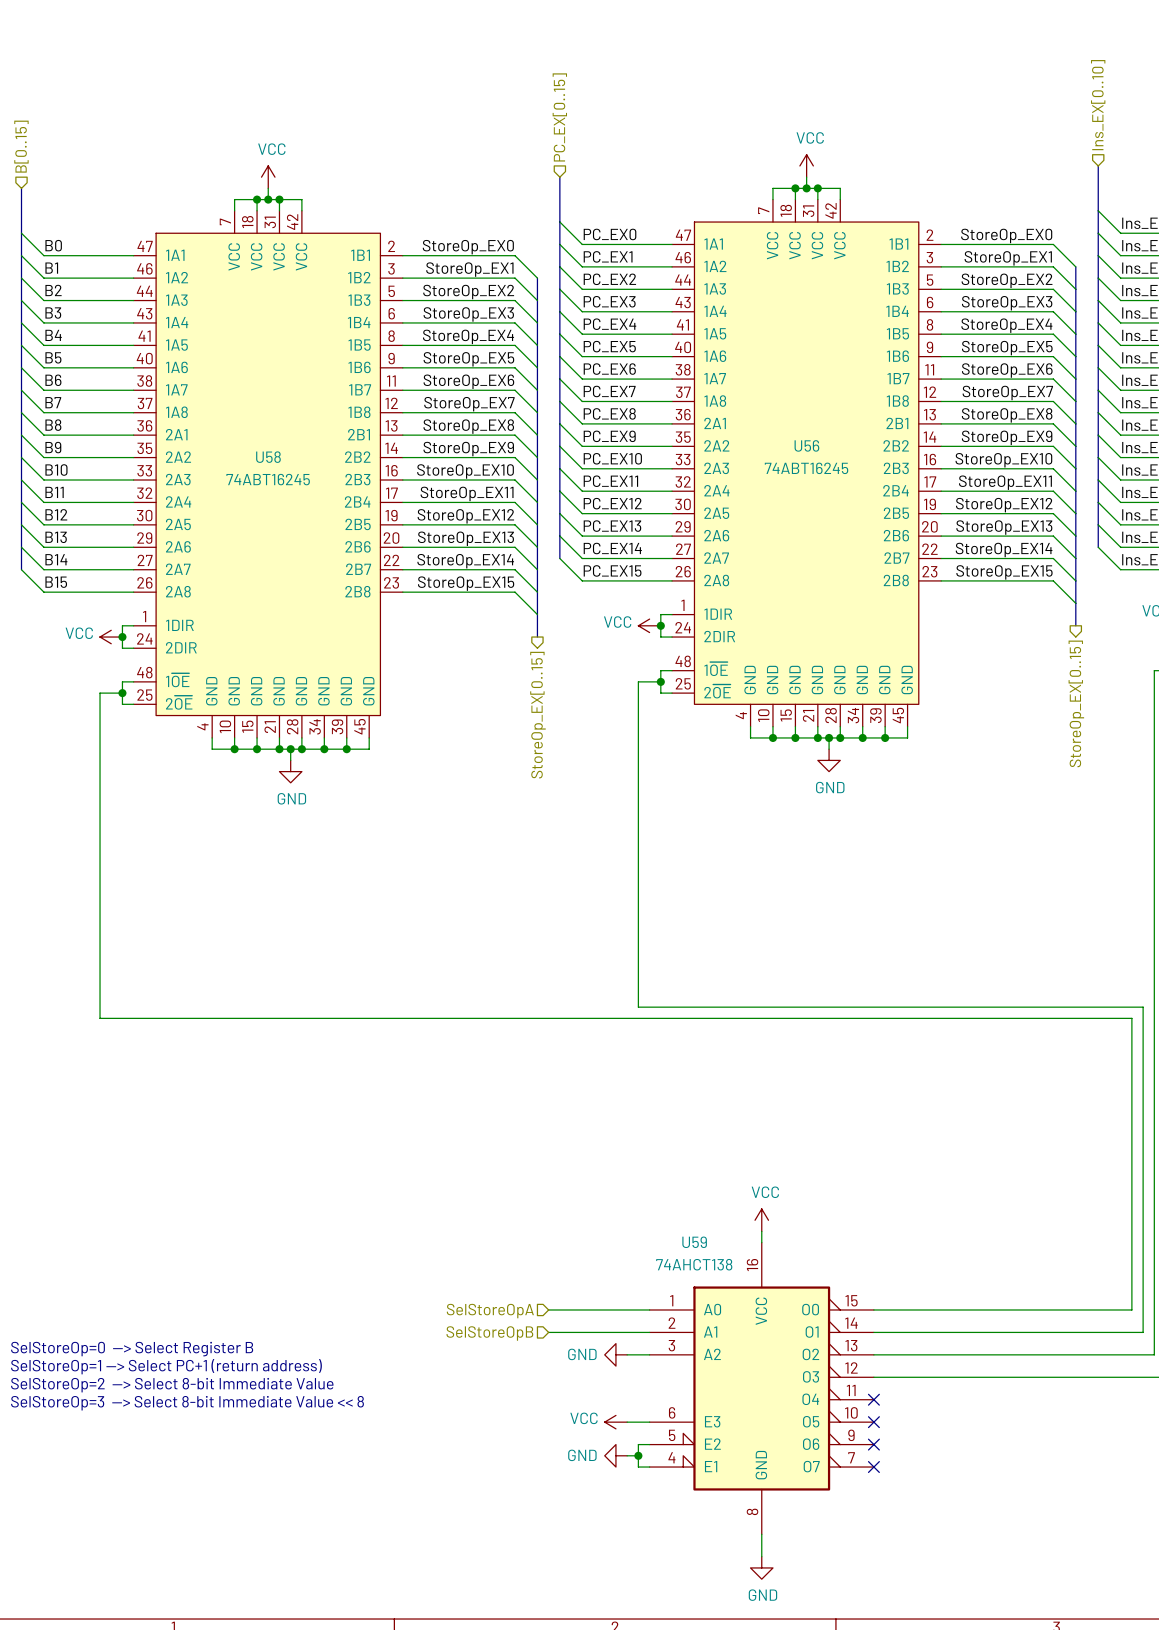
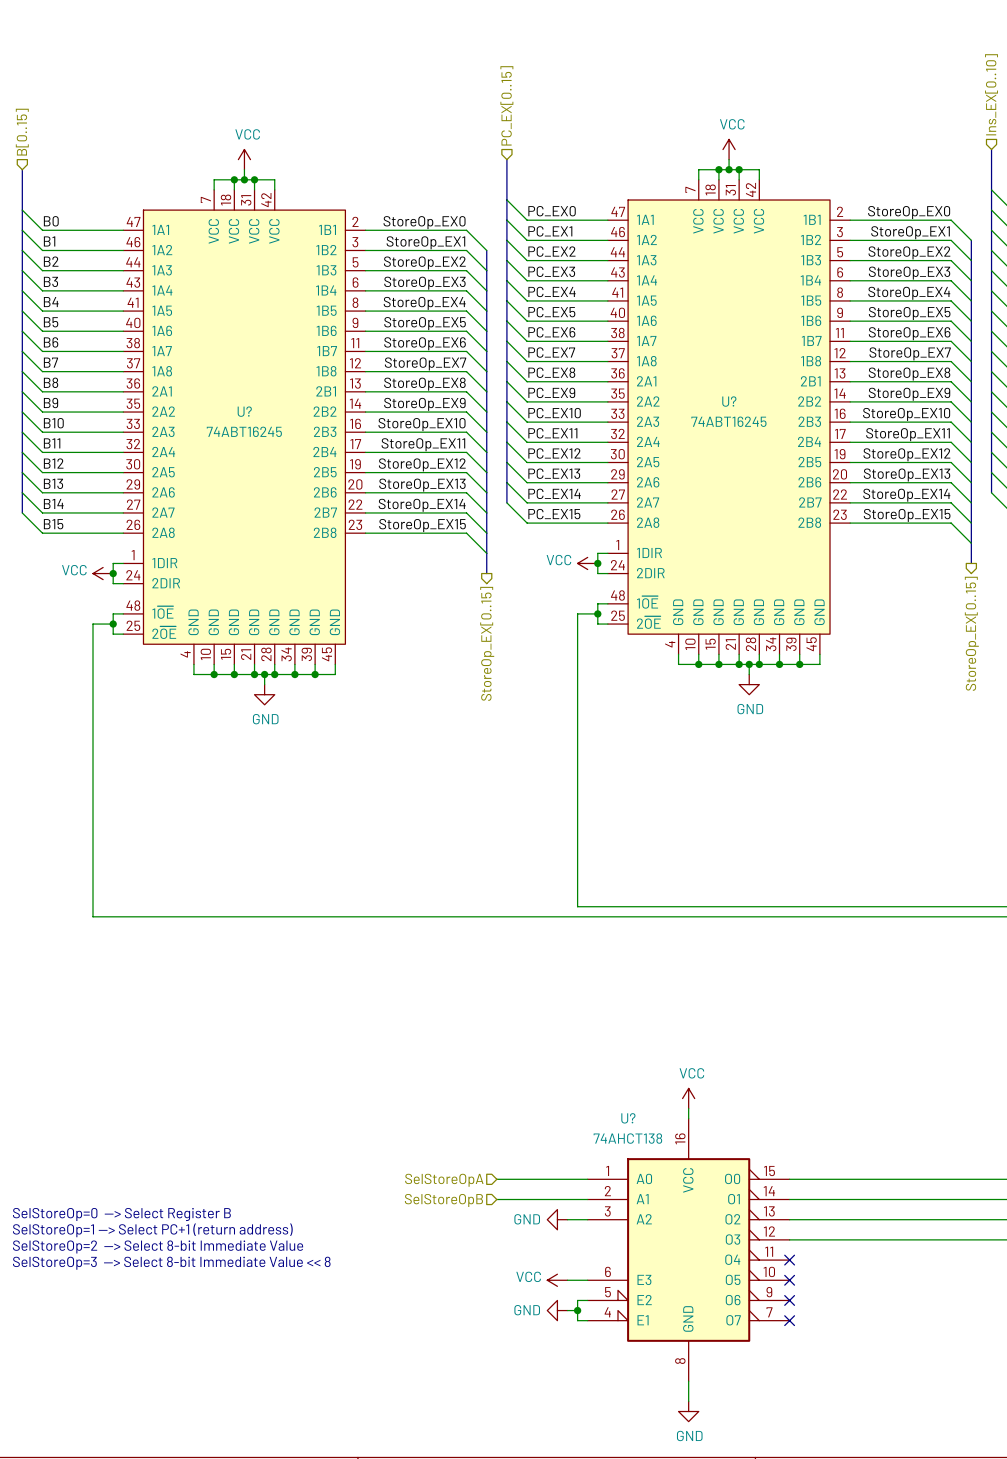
U56 name: U56 (806, 445) -> U? (729, 401)
U58 name: U58 (268, 457) -> U? (244, 411)
U59 name: U59 (694, 1242) -> U? (628, 1118)

